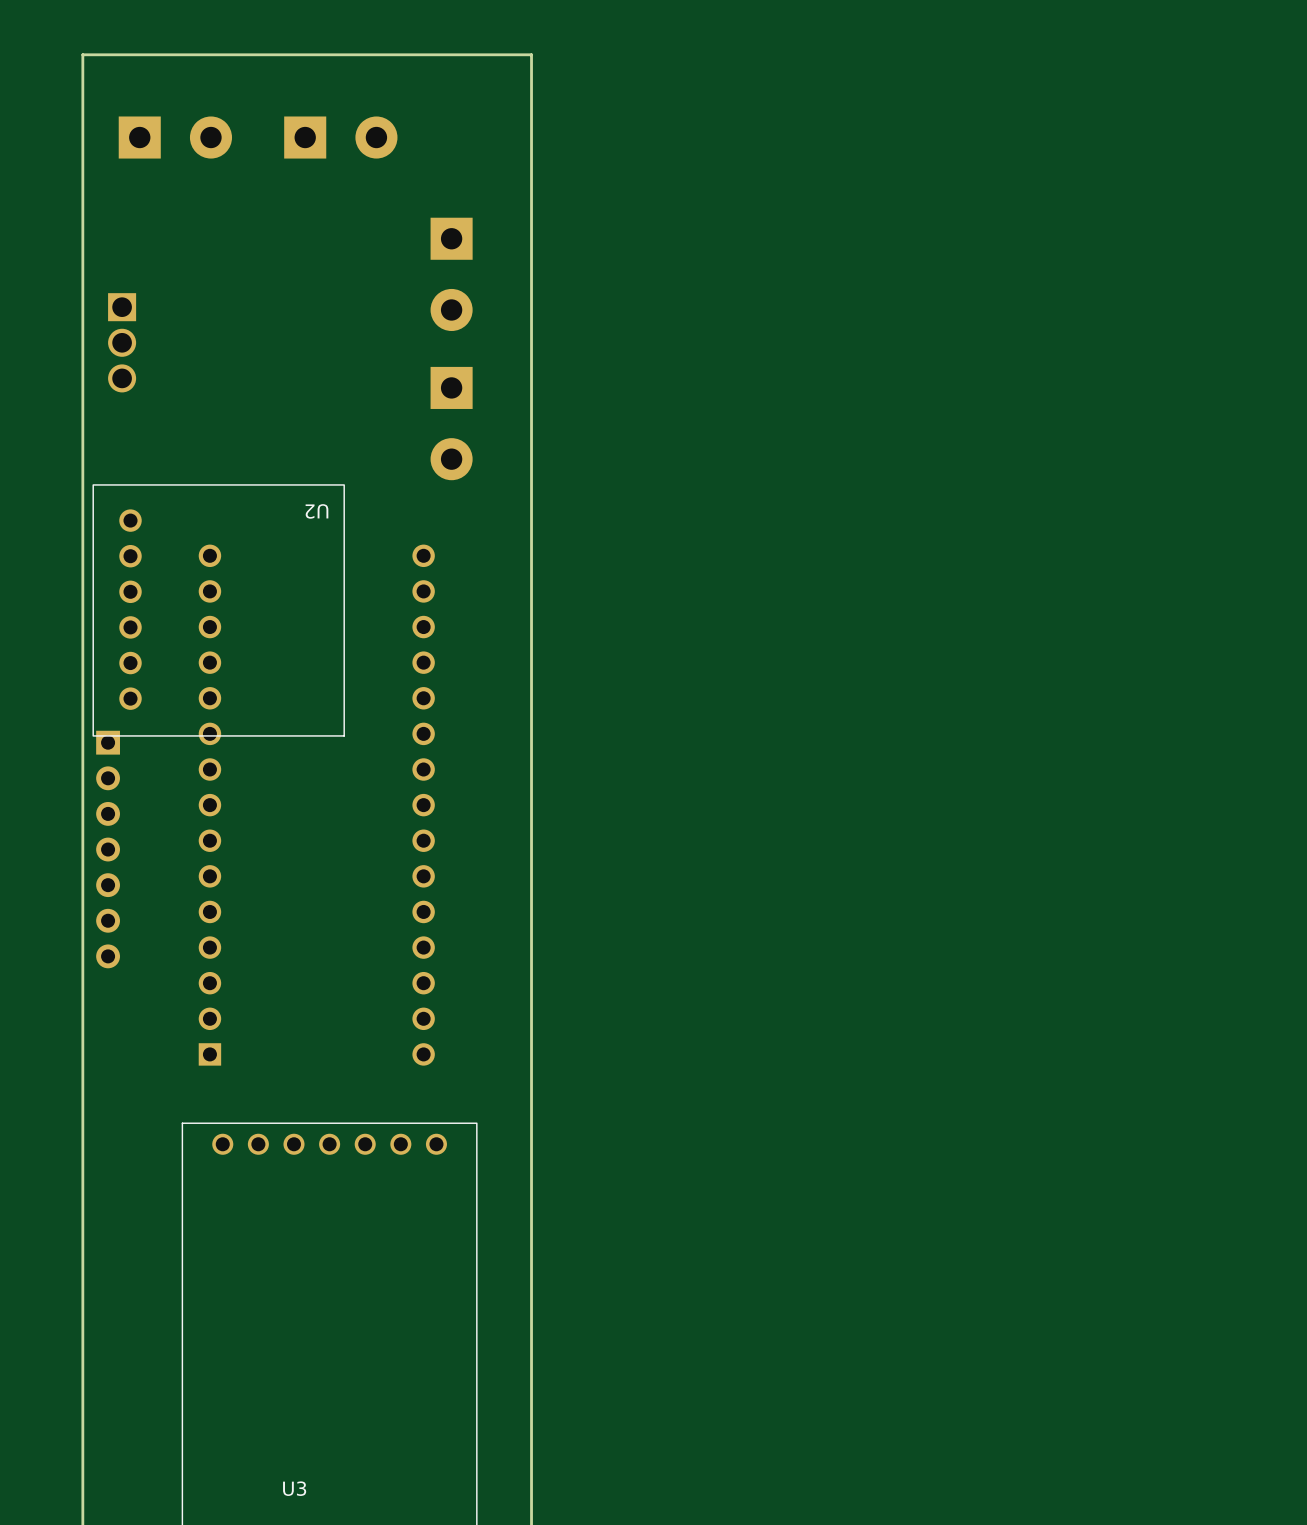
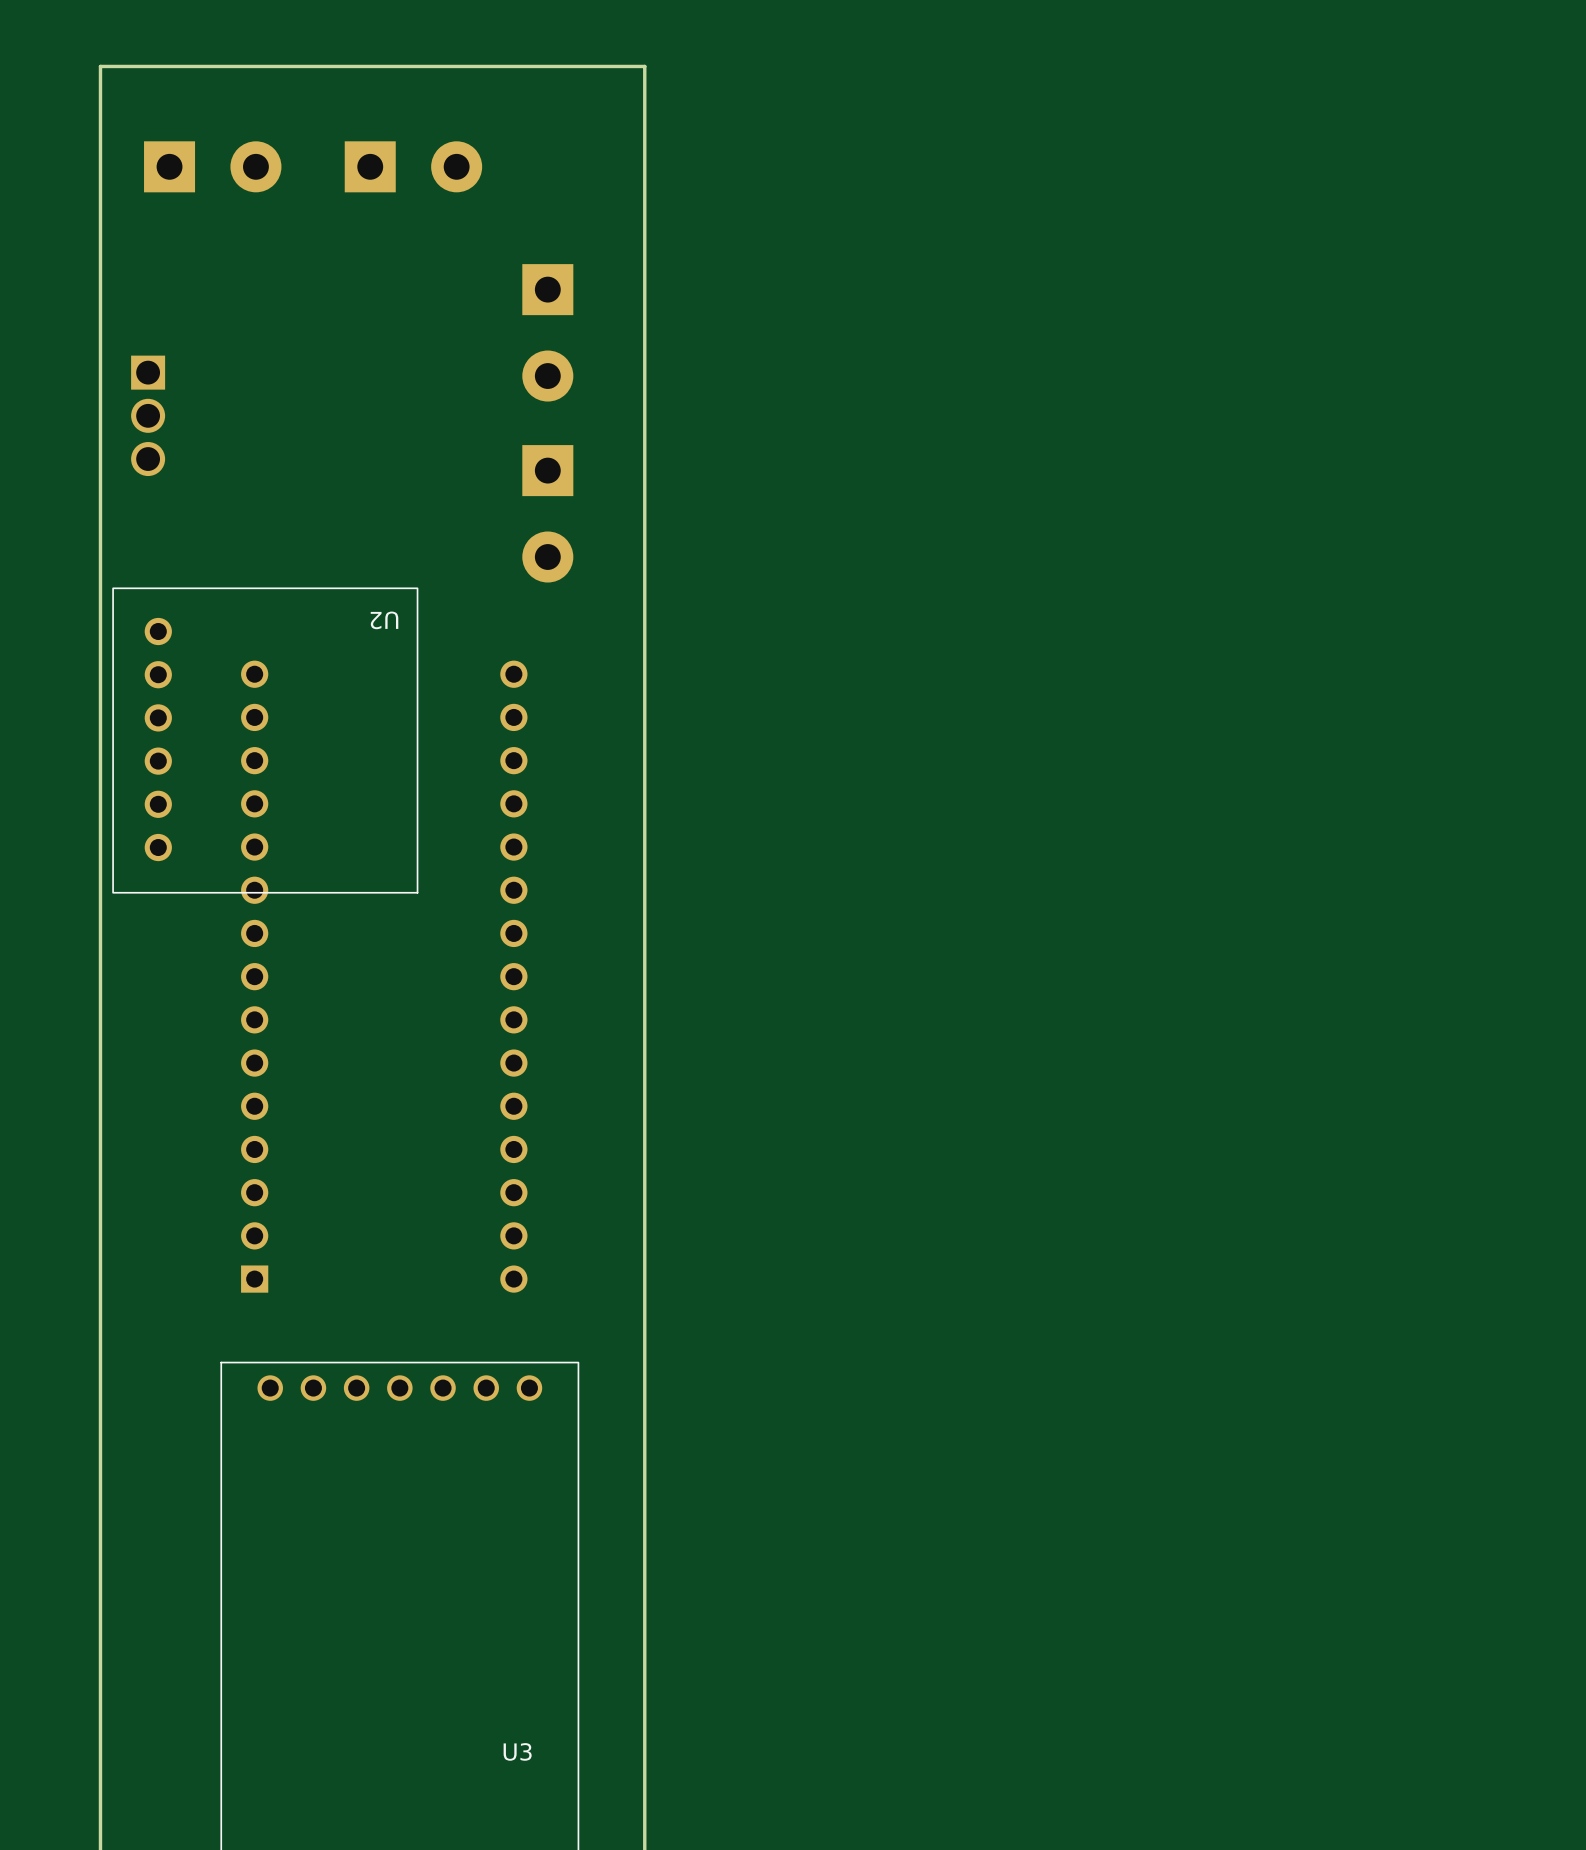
part: (108, 849) -> none
U3 name position: U3 (294, 1488) -> U3 (517, 1751)

